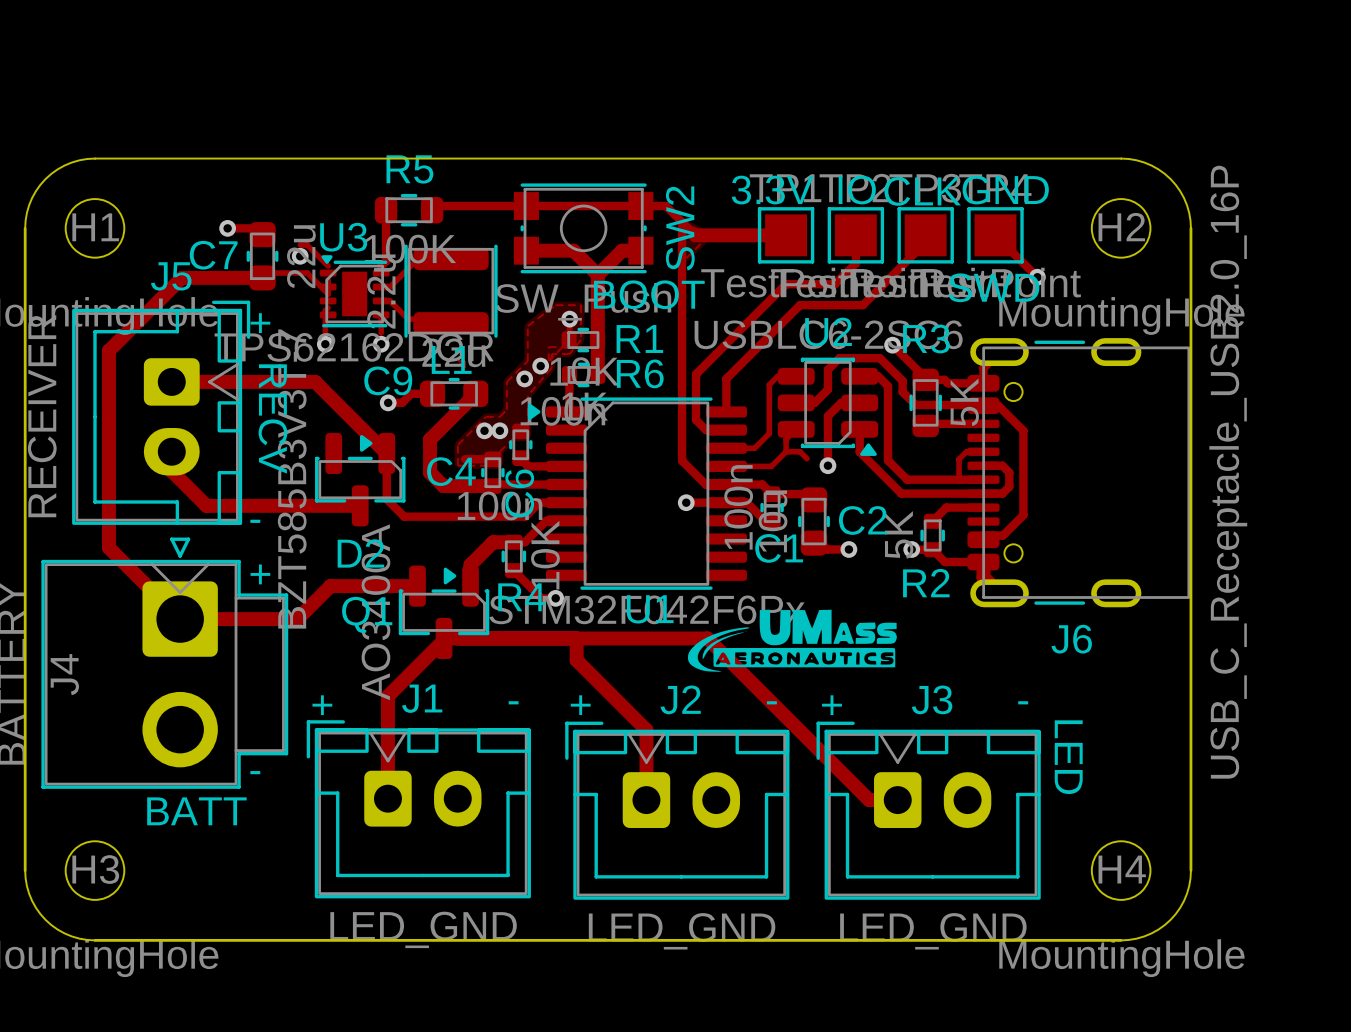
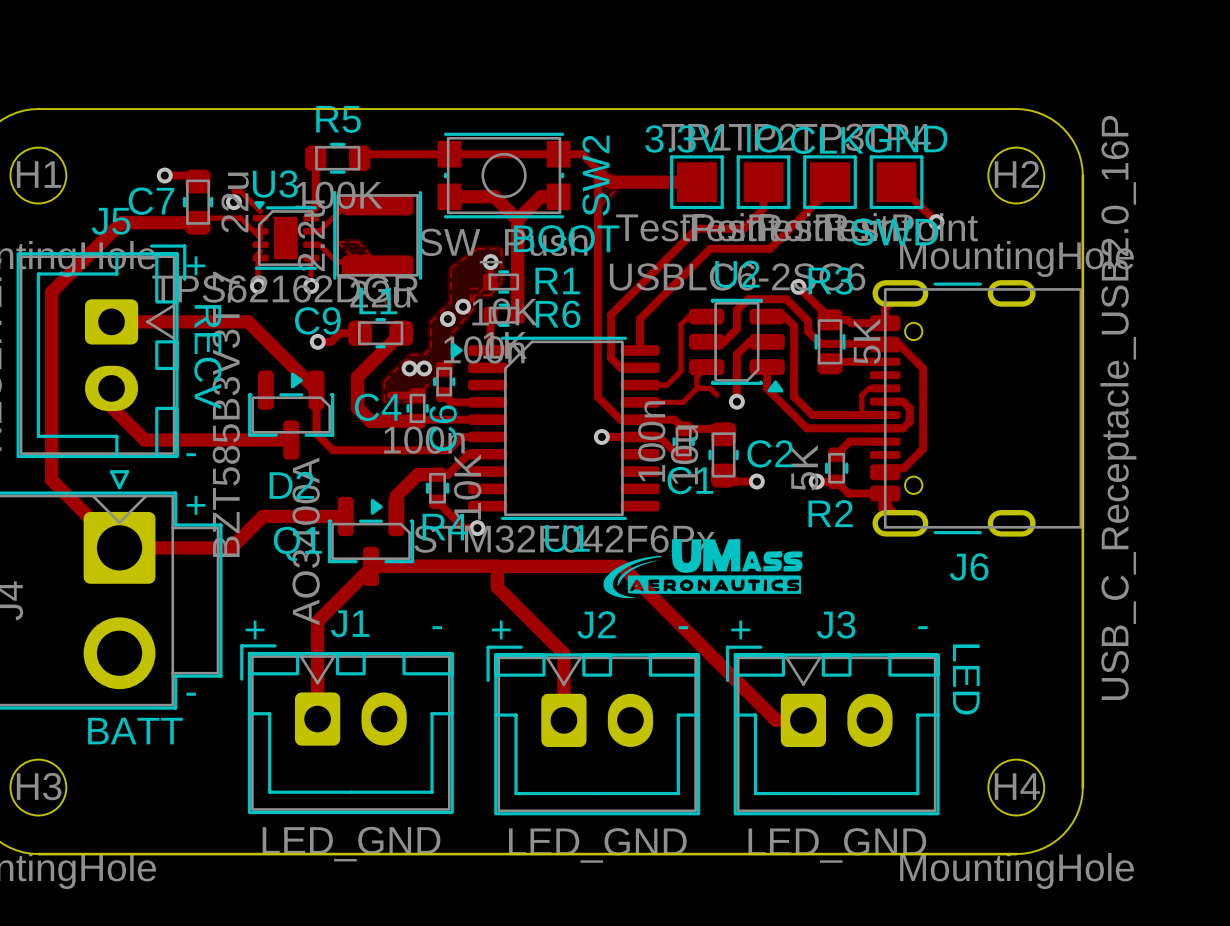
zone outline: none -> (337, 242) (351, 255) (371, 255) (357, 242) (337, 242)

